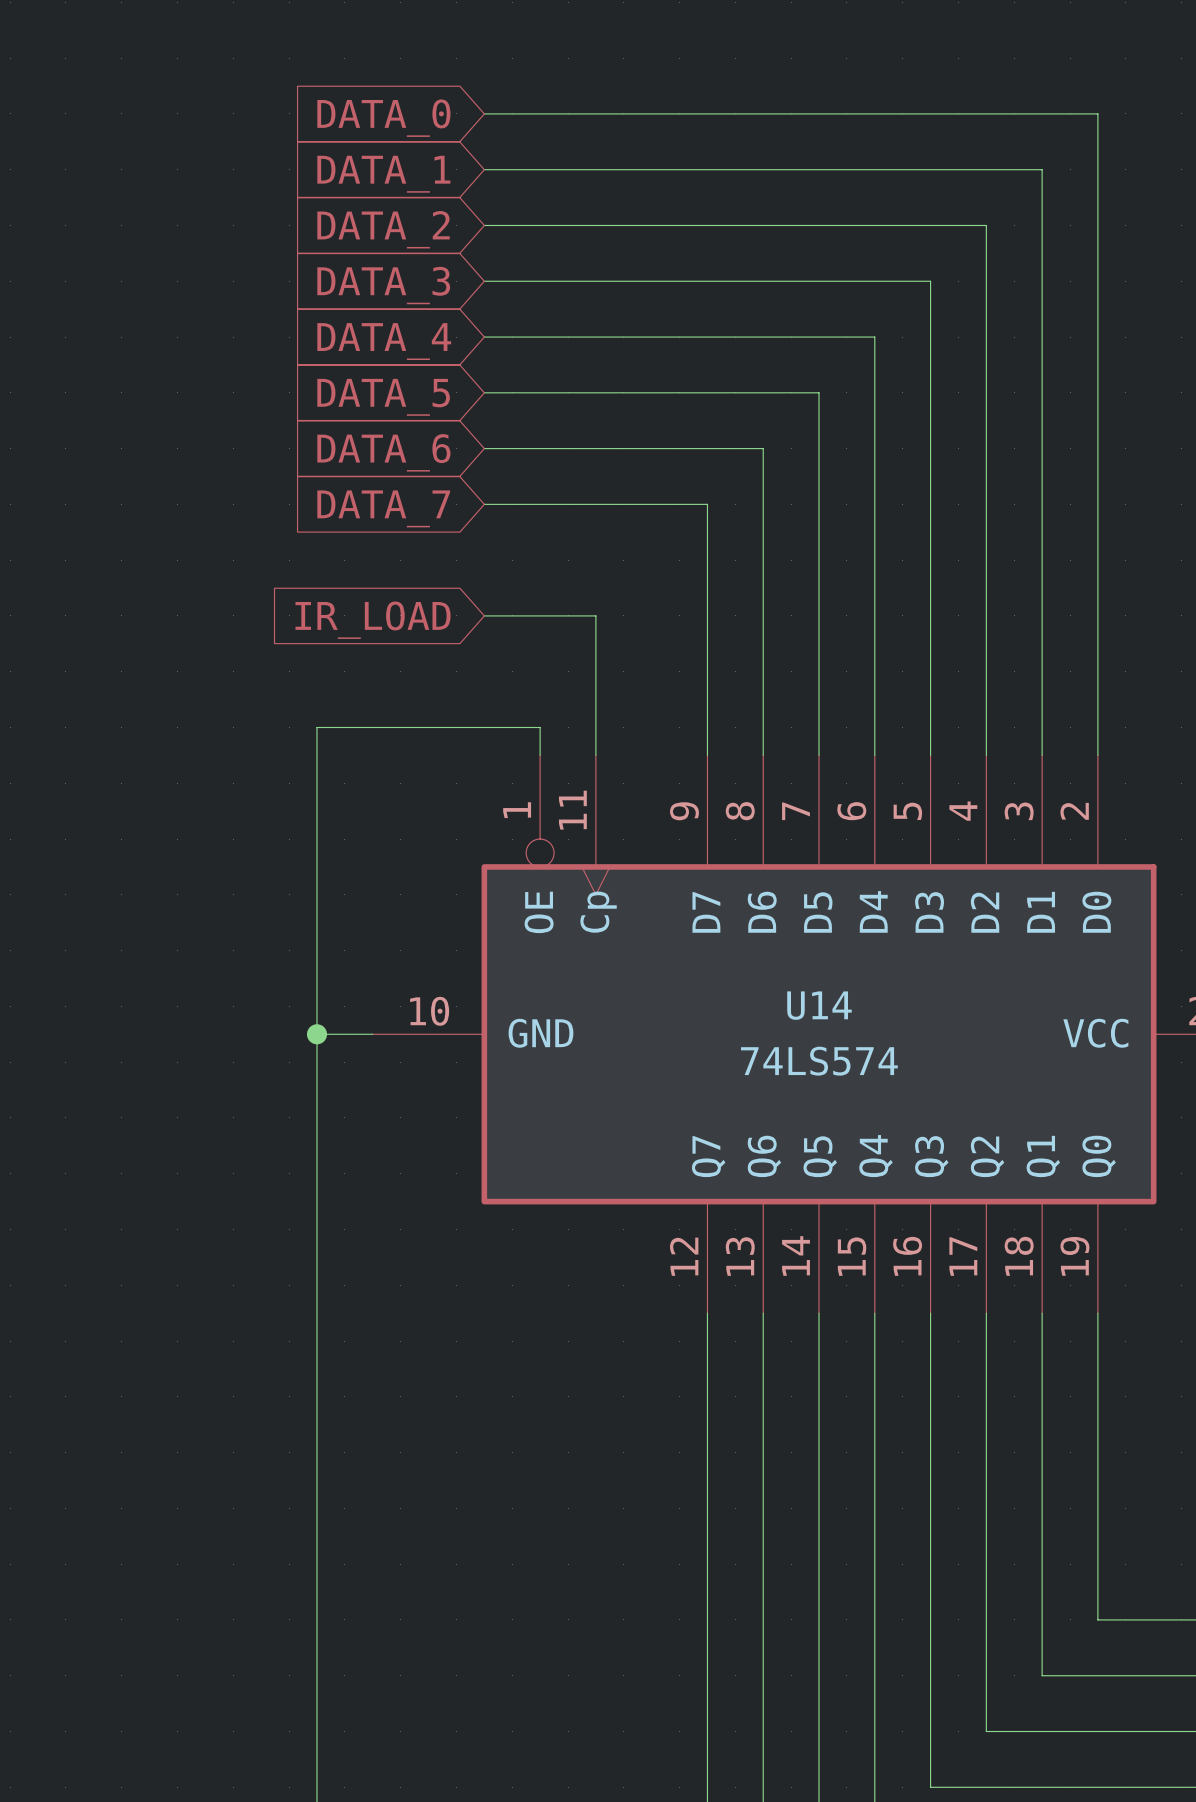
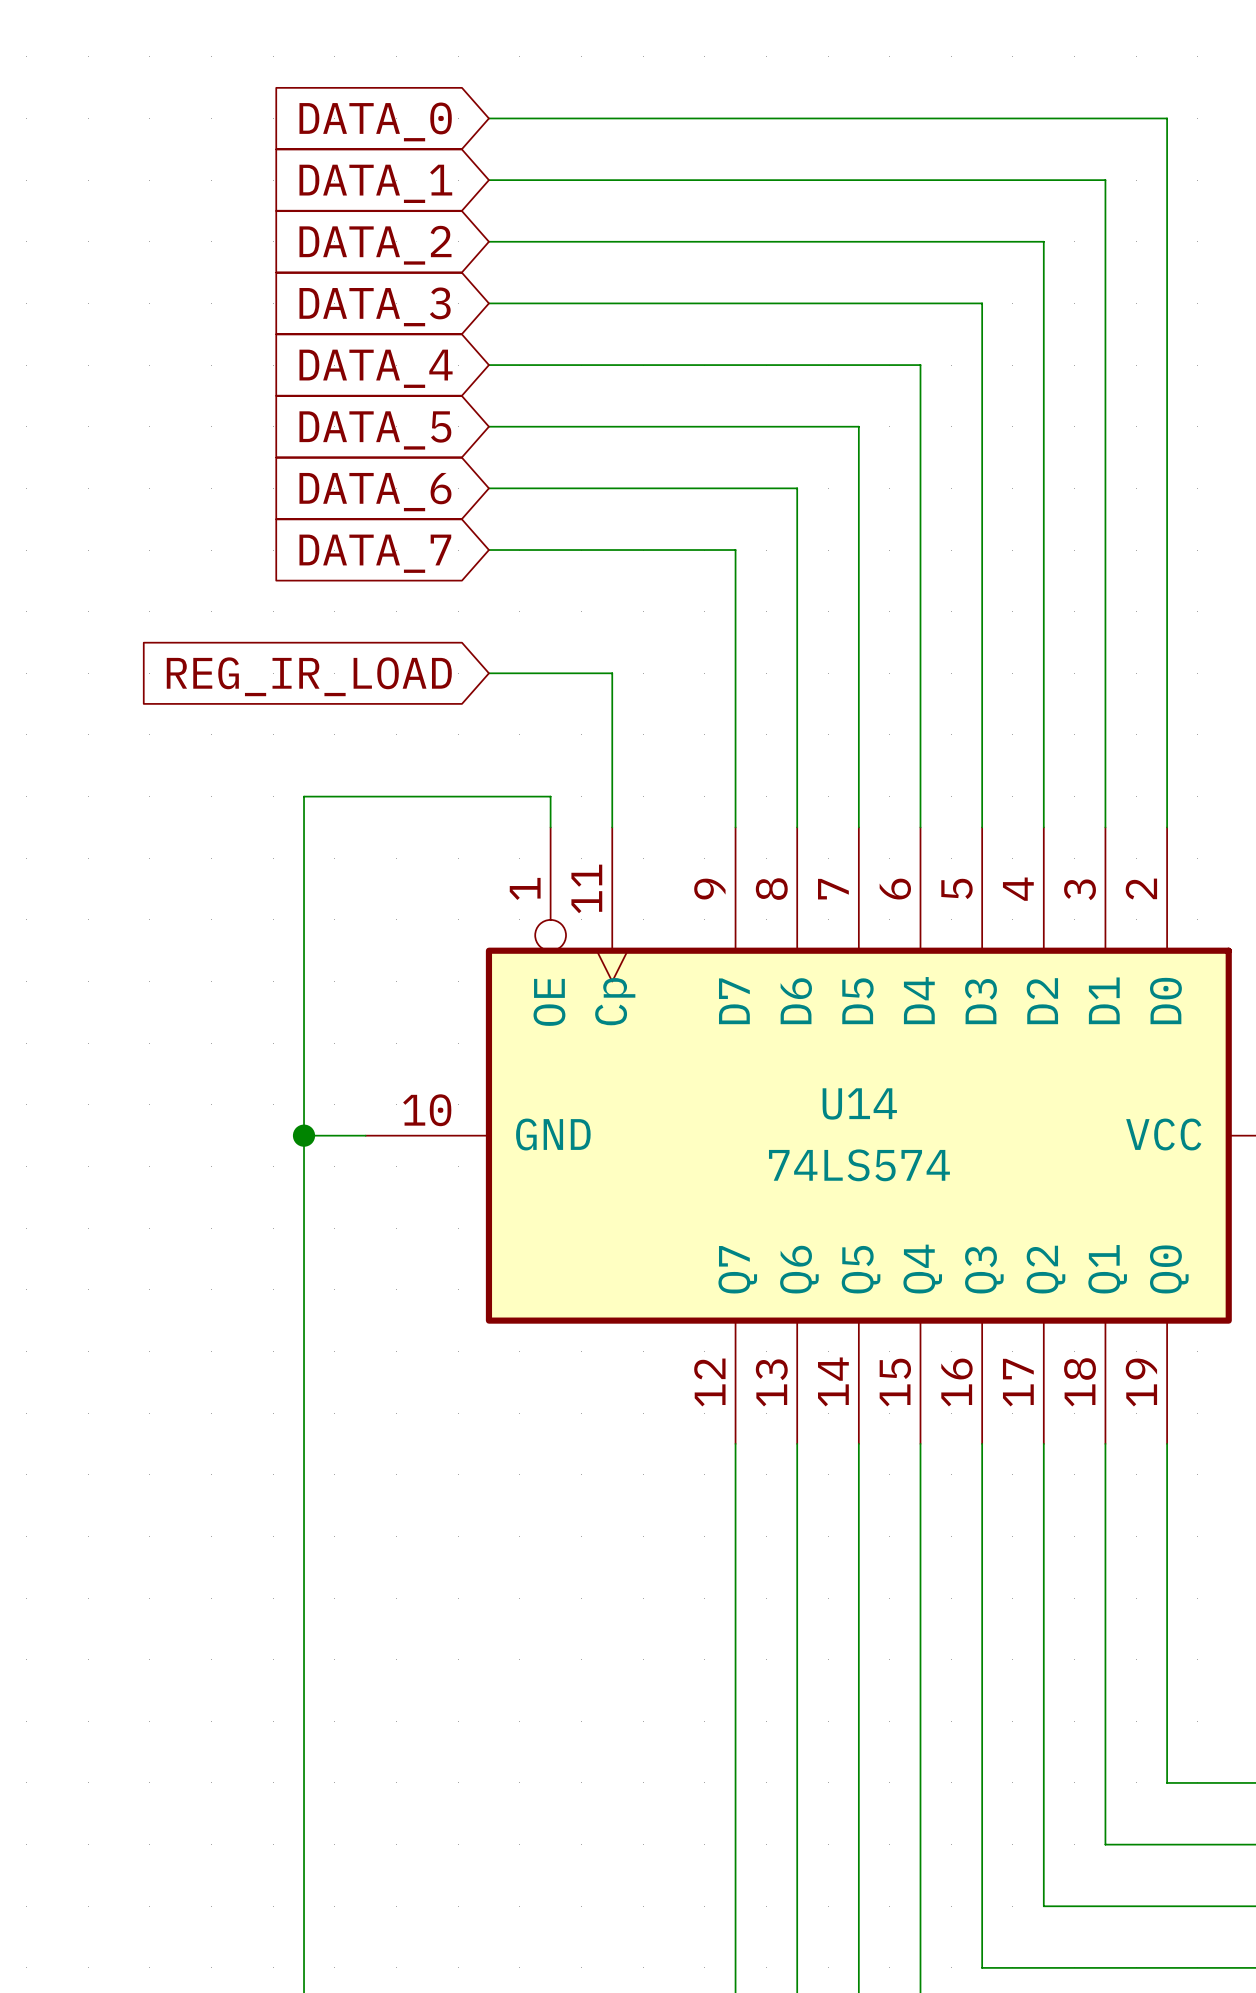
global label: IR_LOAD (373, 620) -> REG_IR_LOAD (309, 676)

